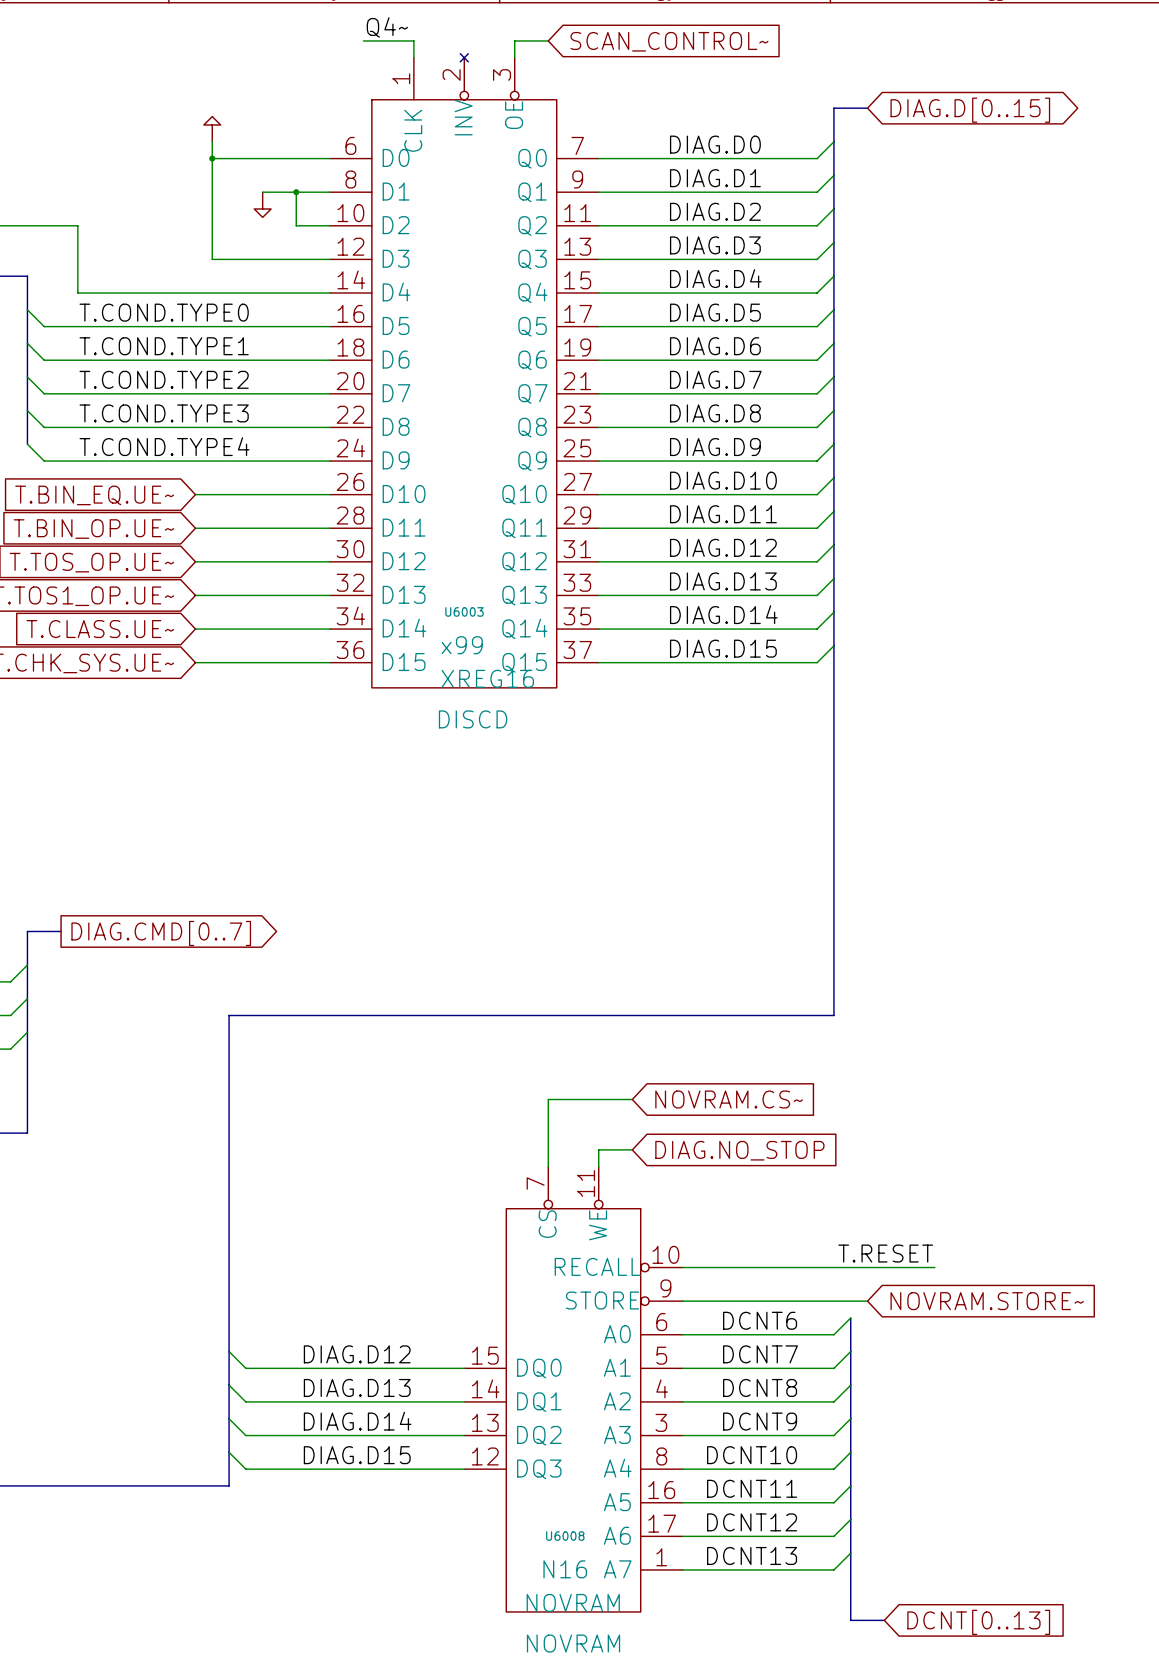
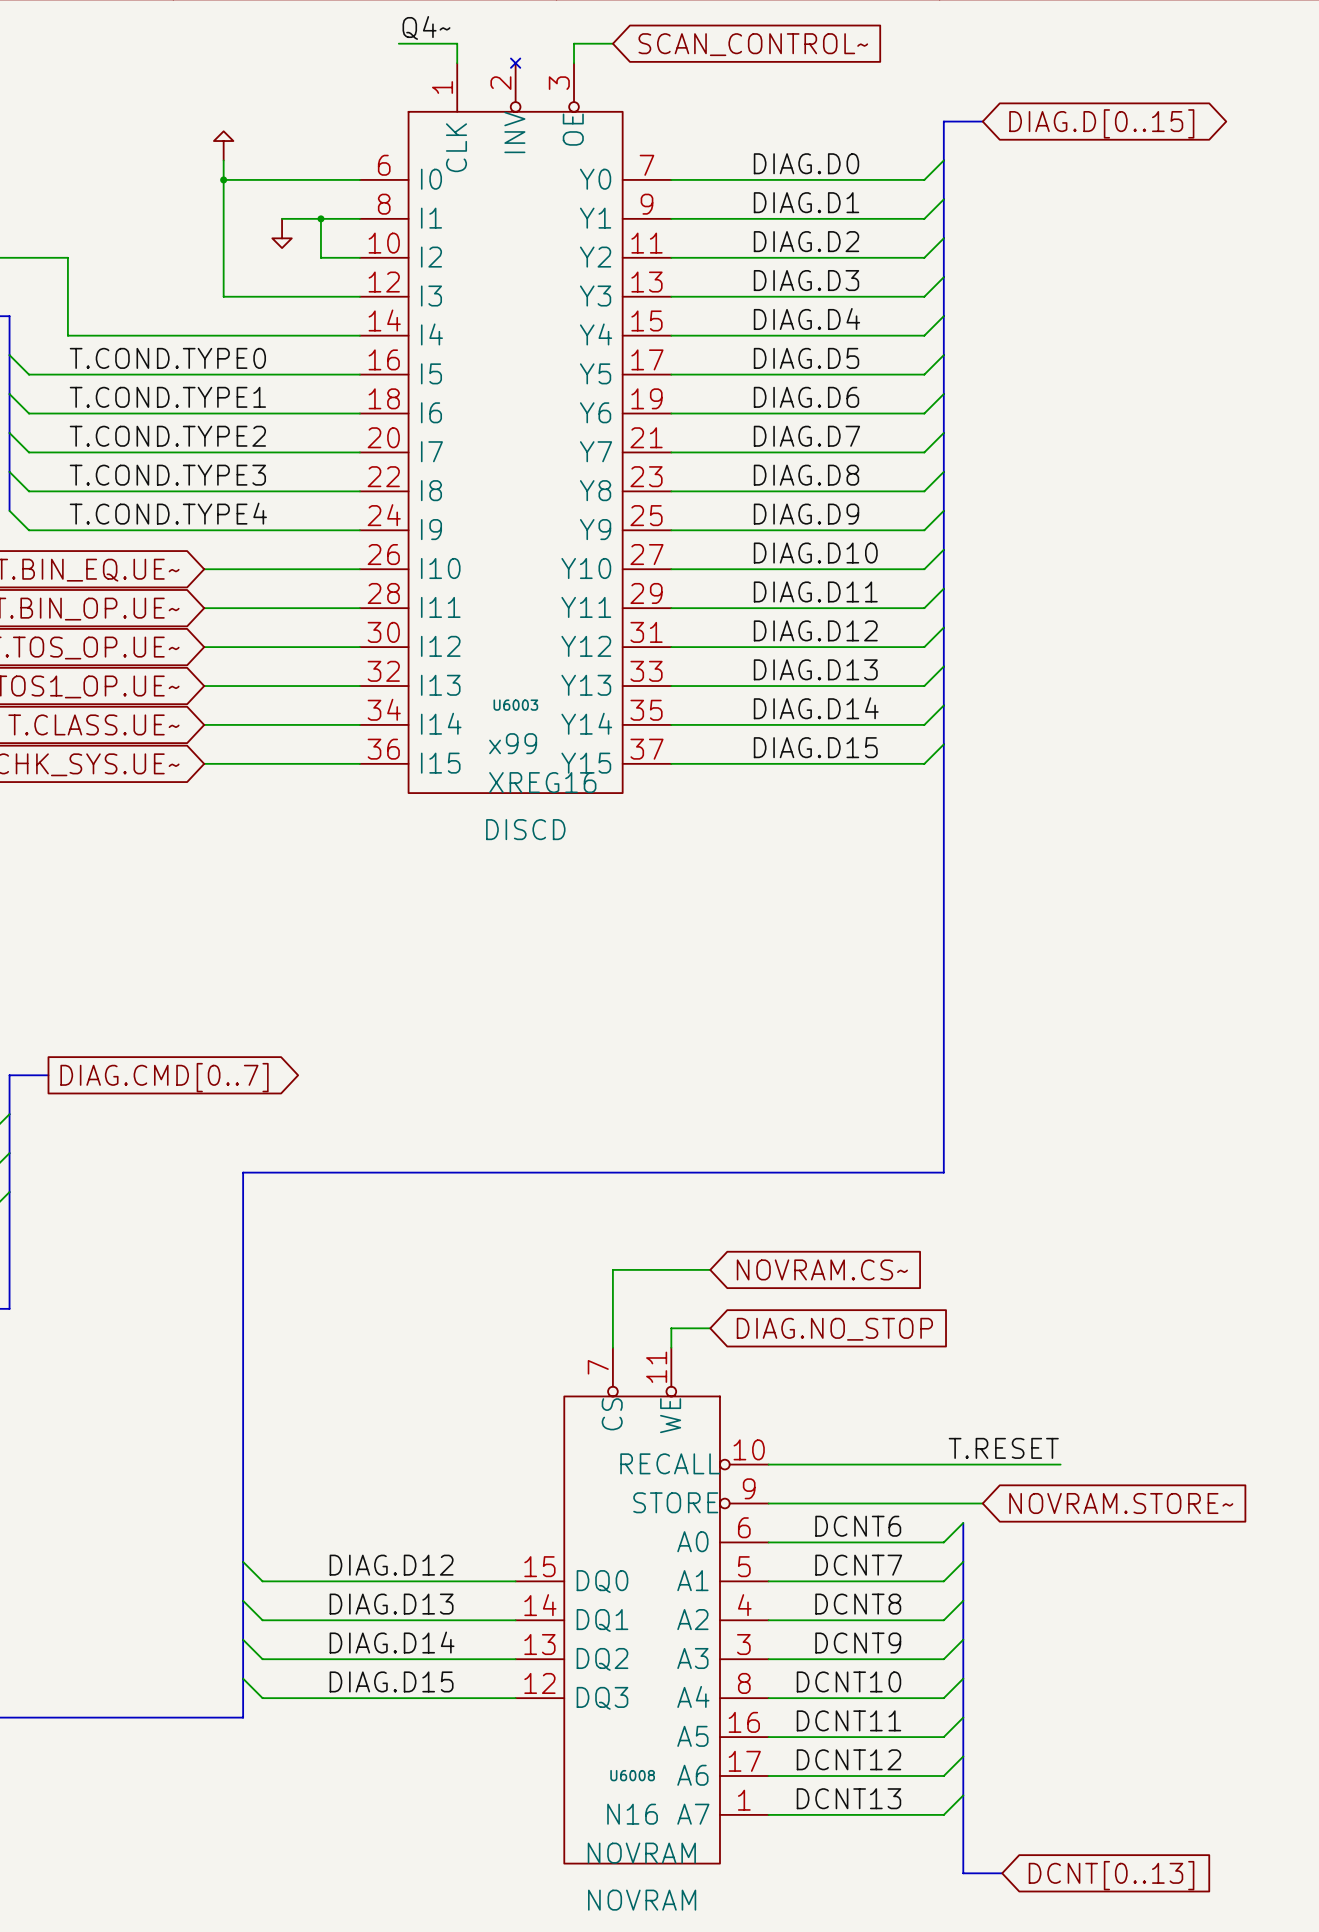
U6003 symbol: [329, 57, 599, 688] -> [359, 63, 672, 794]

